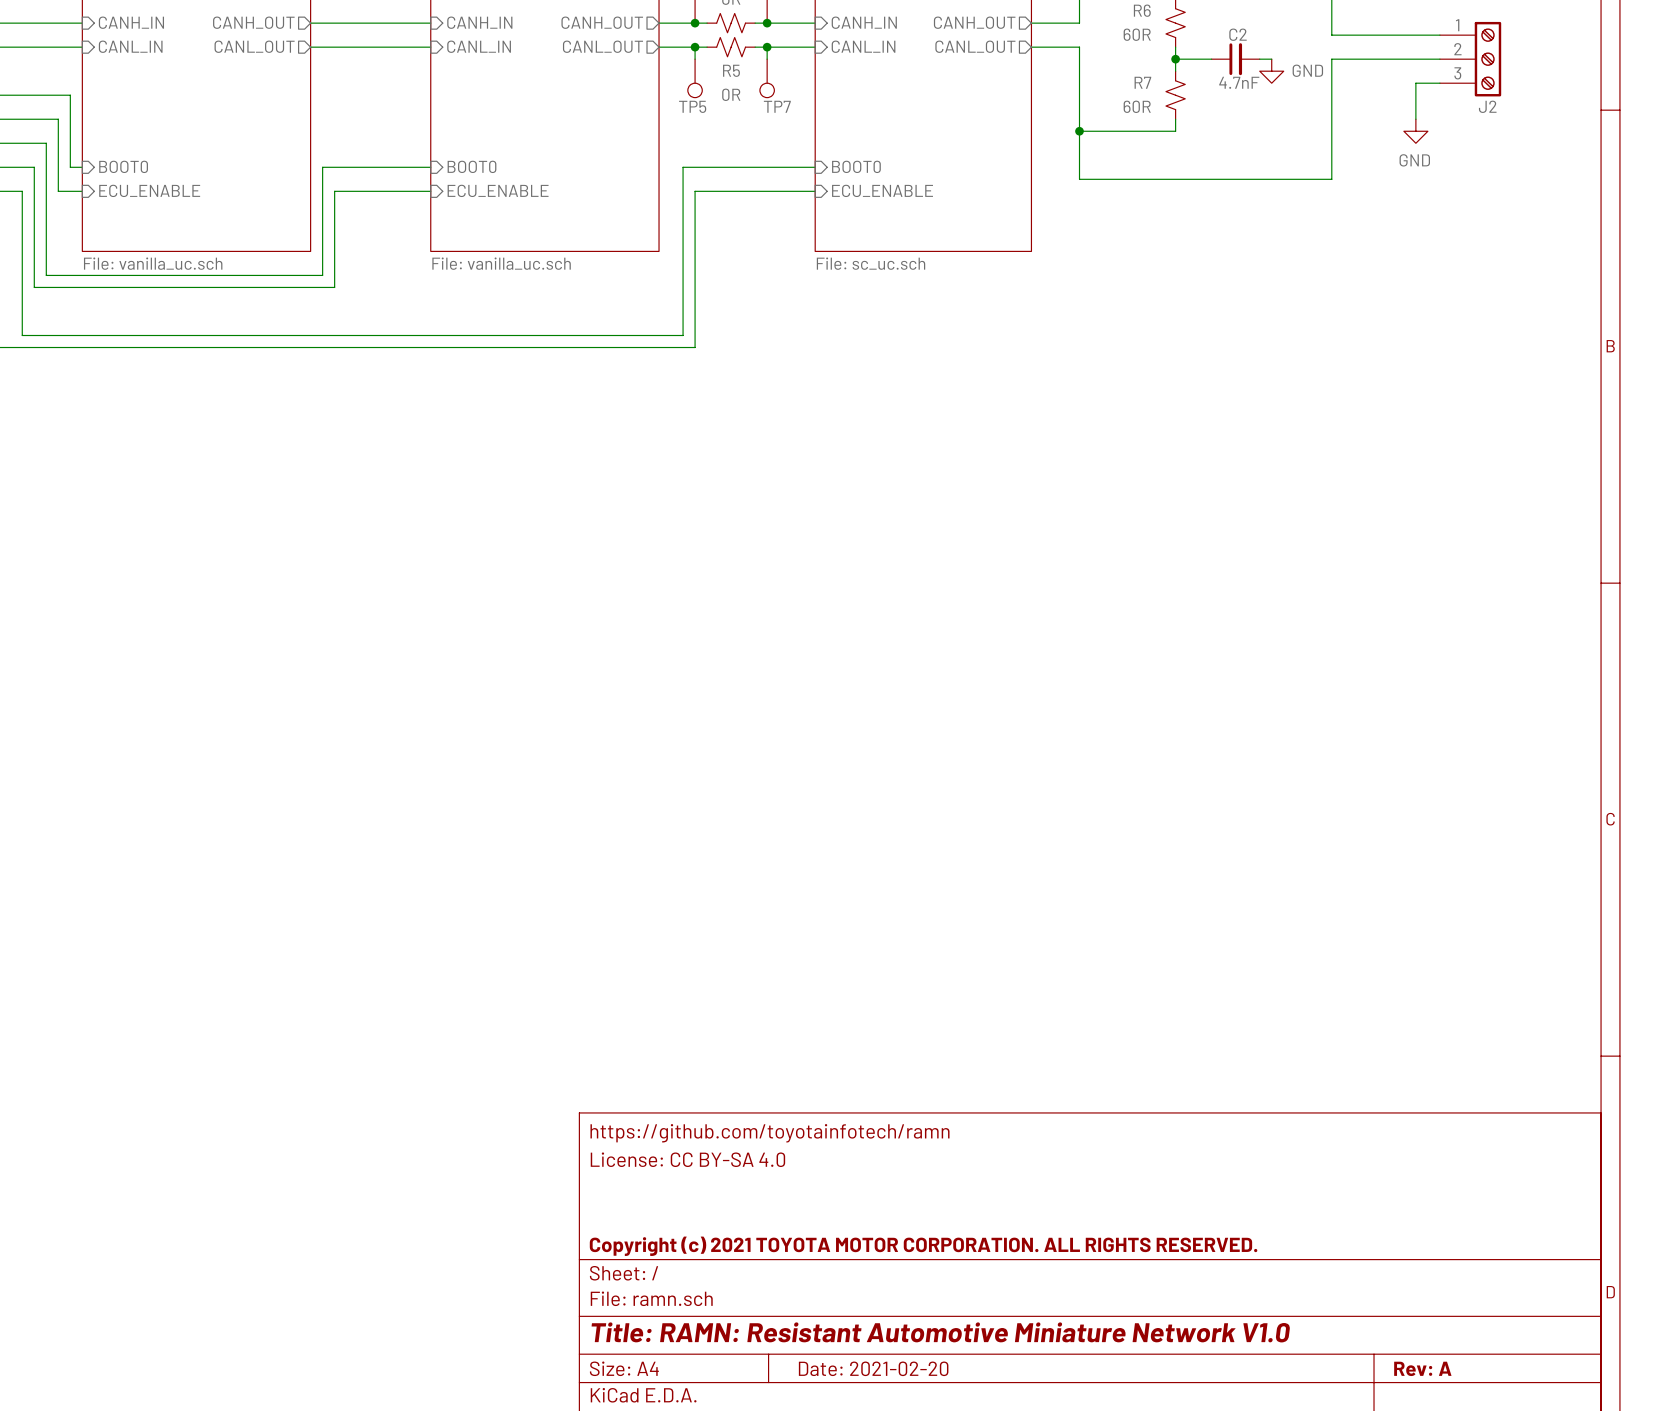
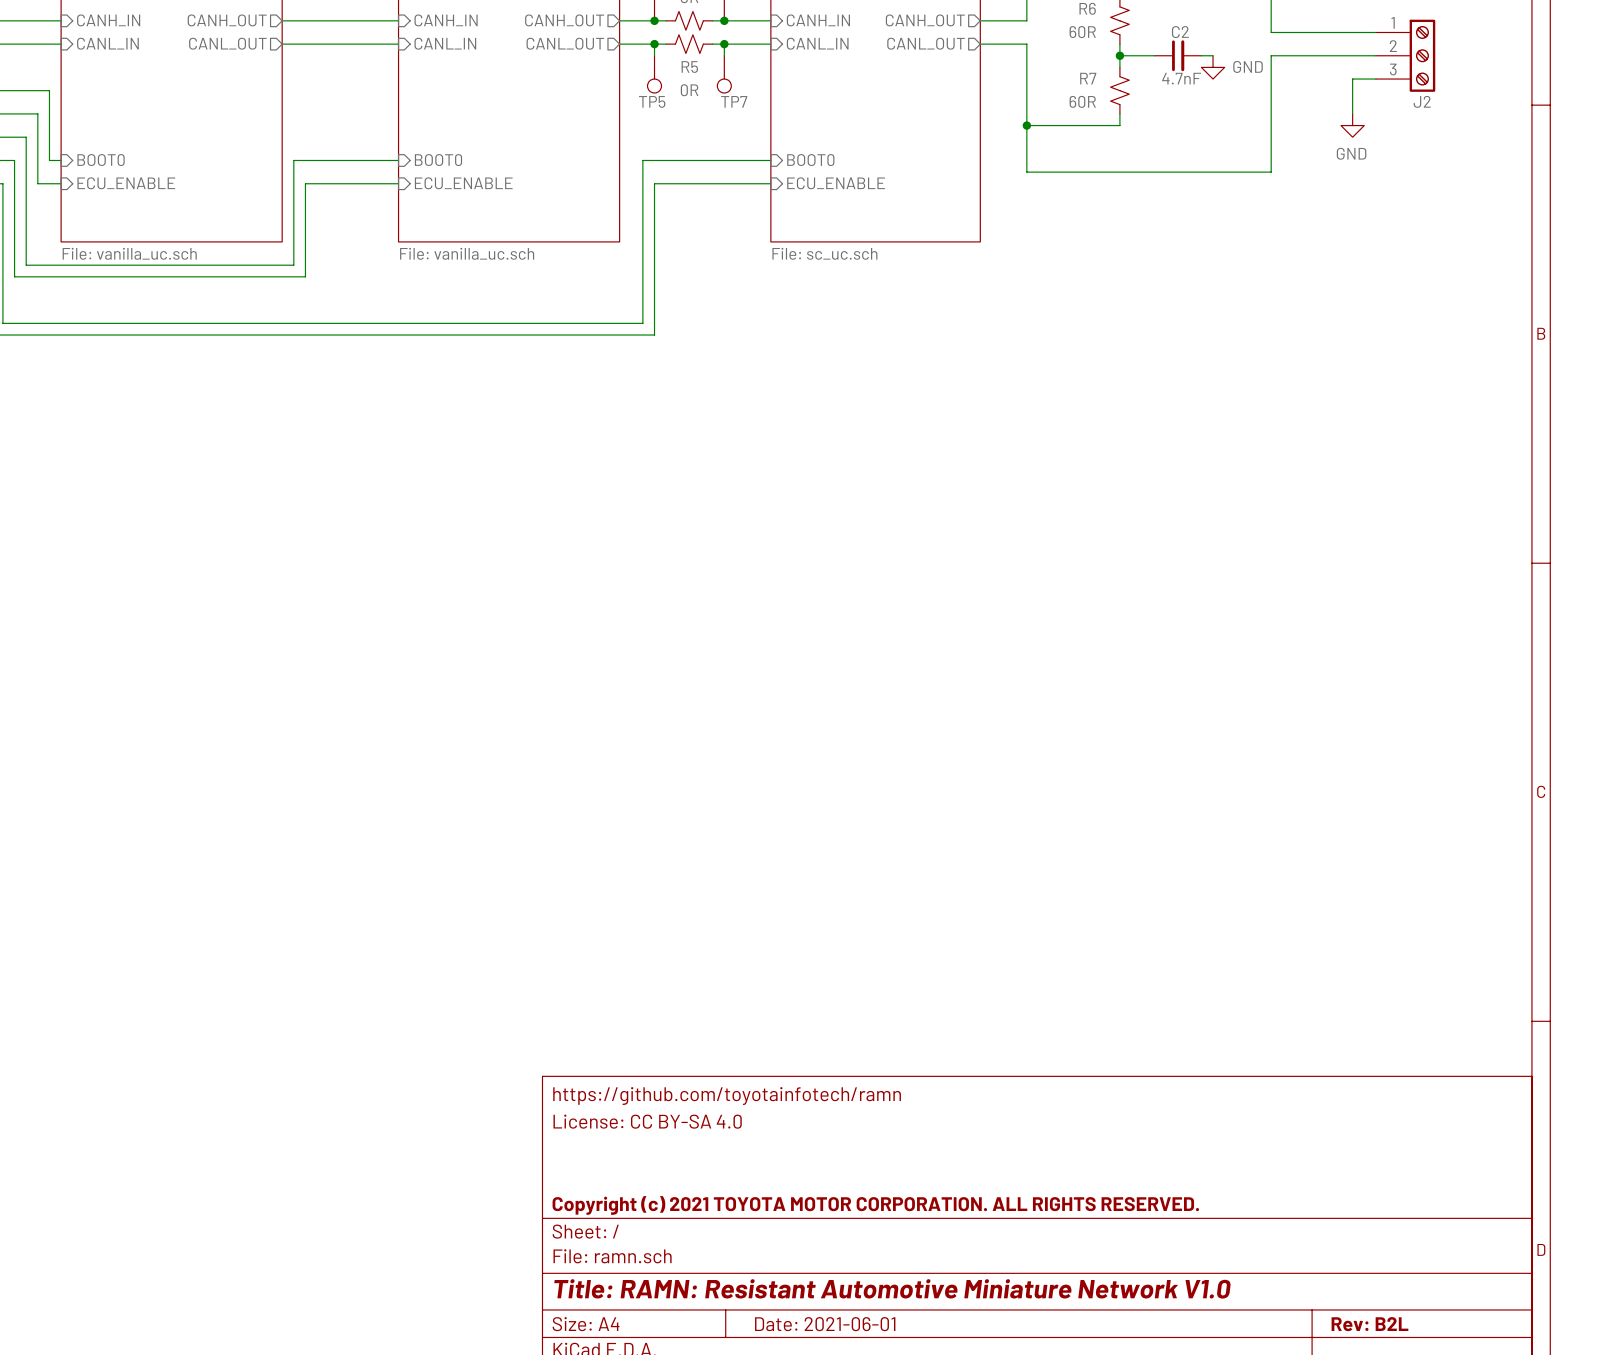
title block: Date: 2021-02-20 (873, 1368) -> Date: 2021-06-01 (825, 1324)
title block: Rev: A (1422, 1368) -> Rev: B2L (1369, 1324)

